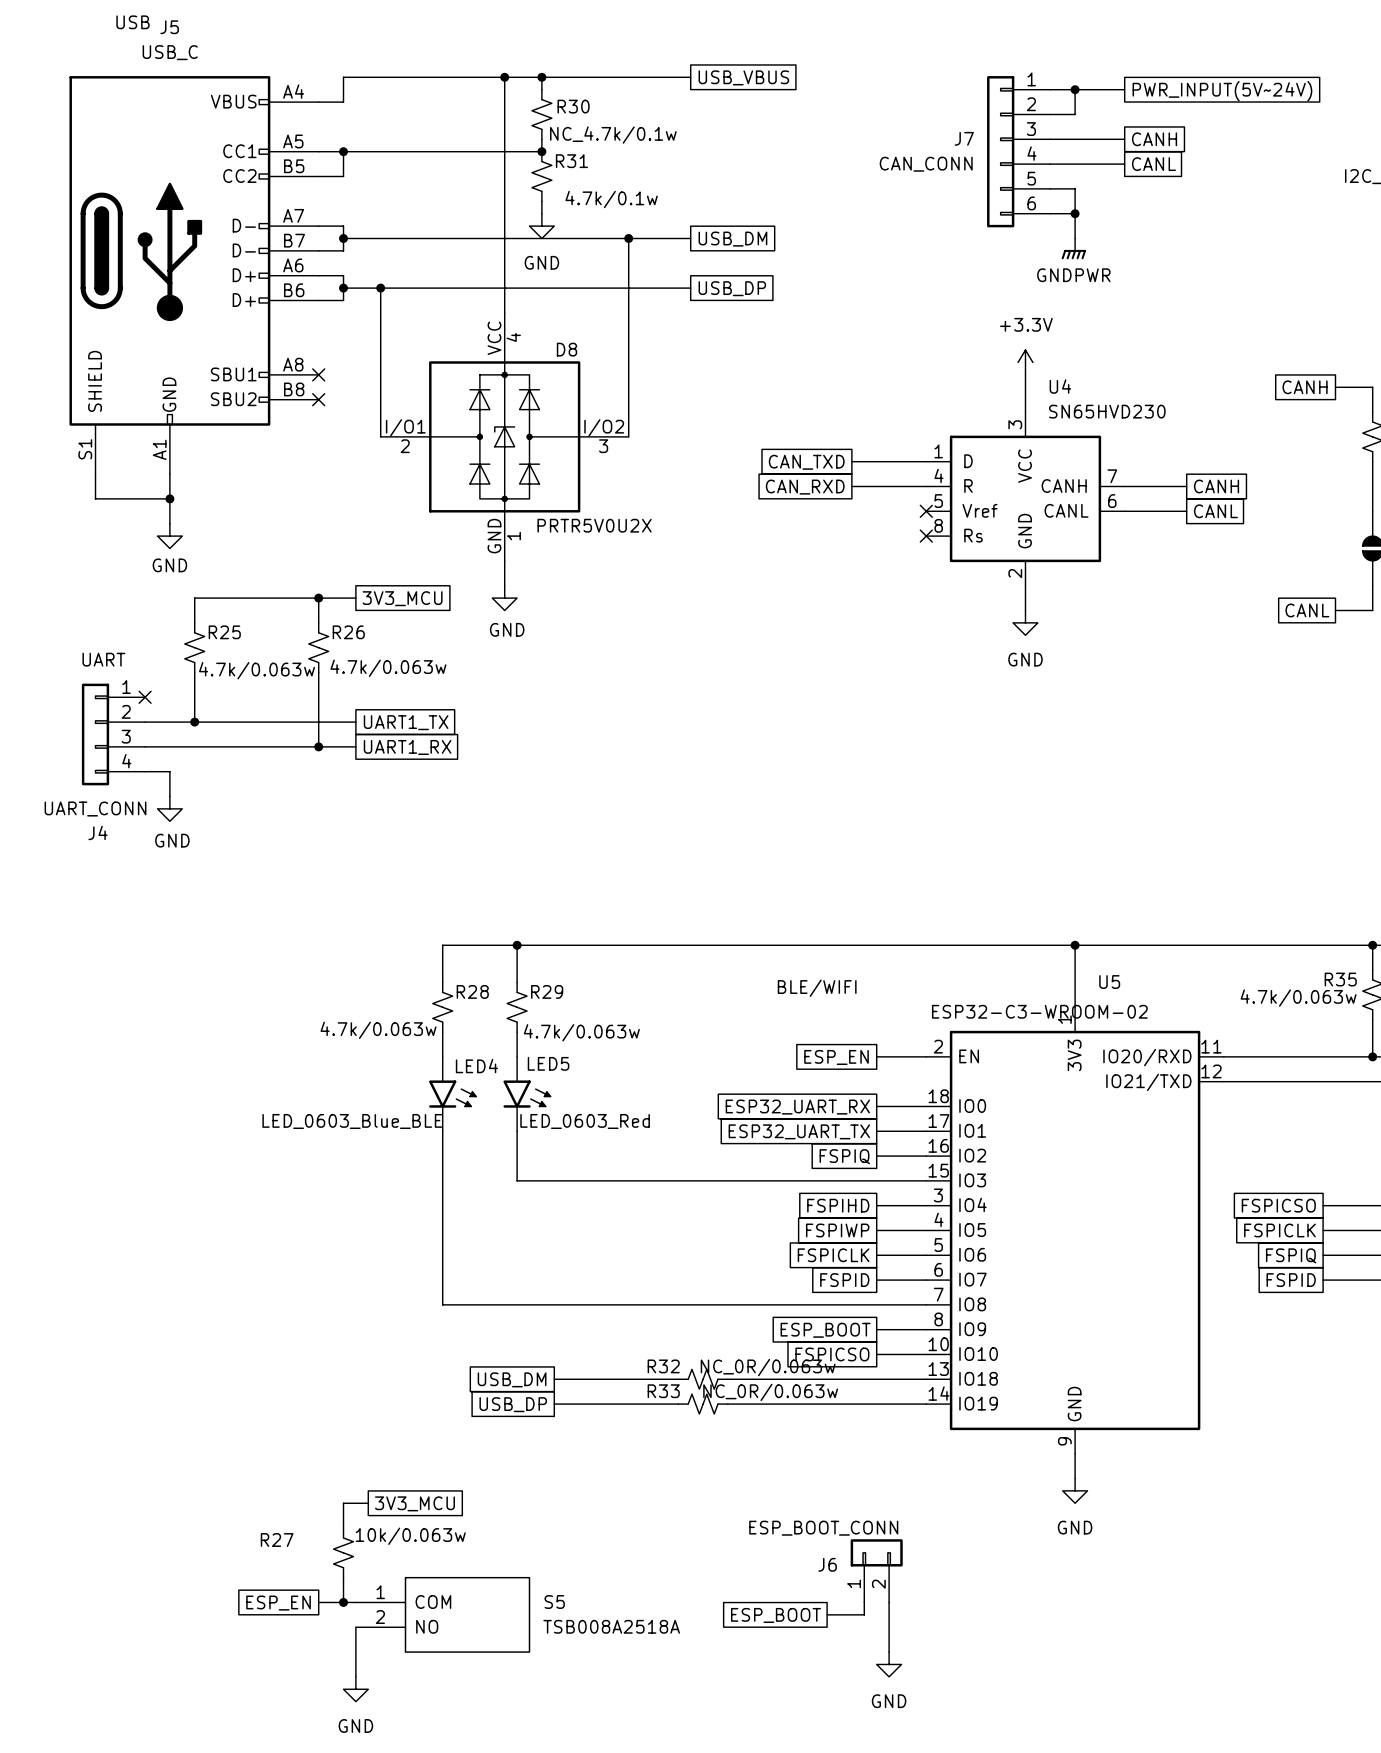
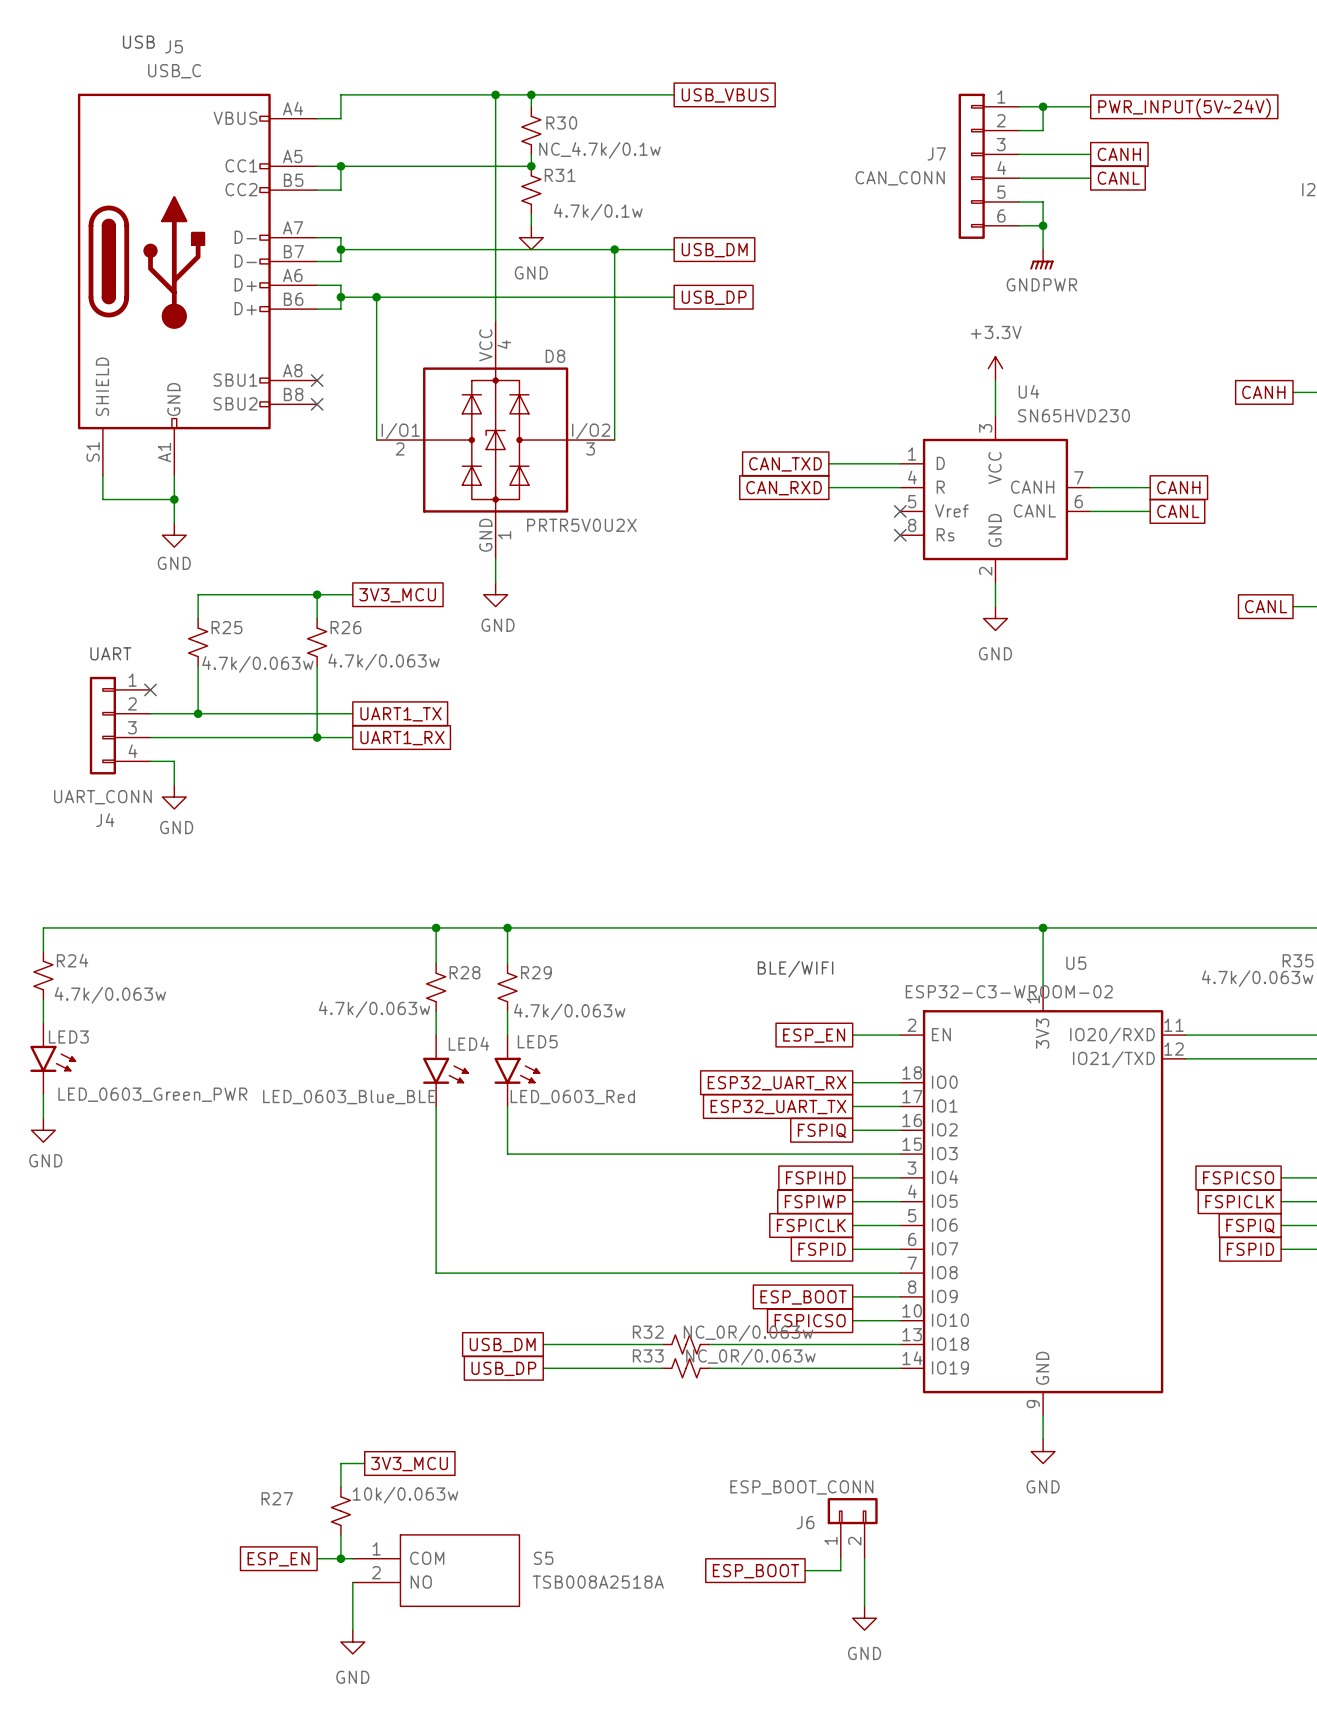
wire: none -> (436, 927) (43, 927) (43, 951)
junction: none -> (436, 927)
R24: none -> 4.7k/0.063w (43, 975)
wire: none -> (43, 999) (43, 1023)
LED3: none -> LED_0603_Green_PWR (53, 1058)
wire: none -> (43, 1094) (43, 1118)
power symbol: none -> GND (43, 1130)

